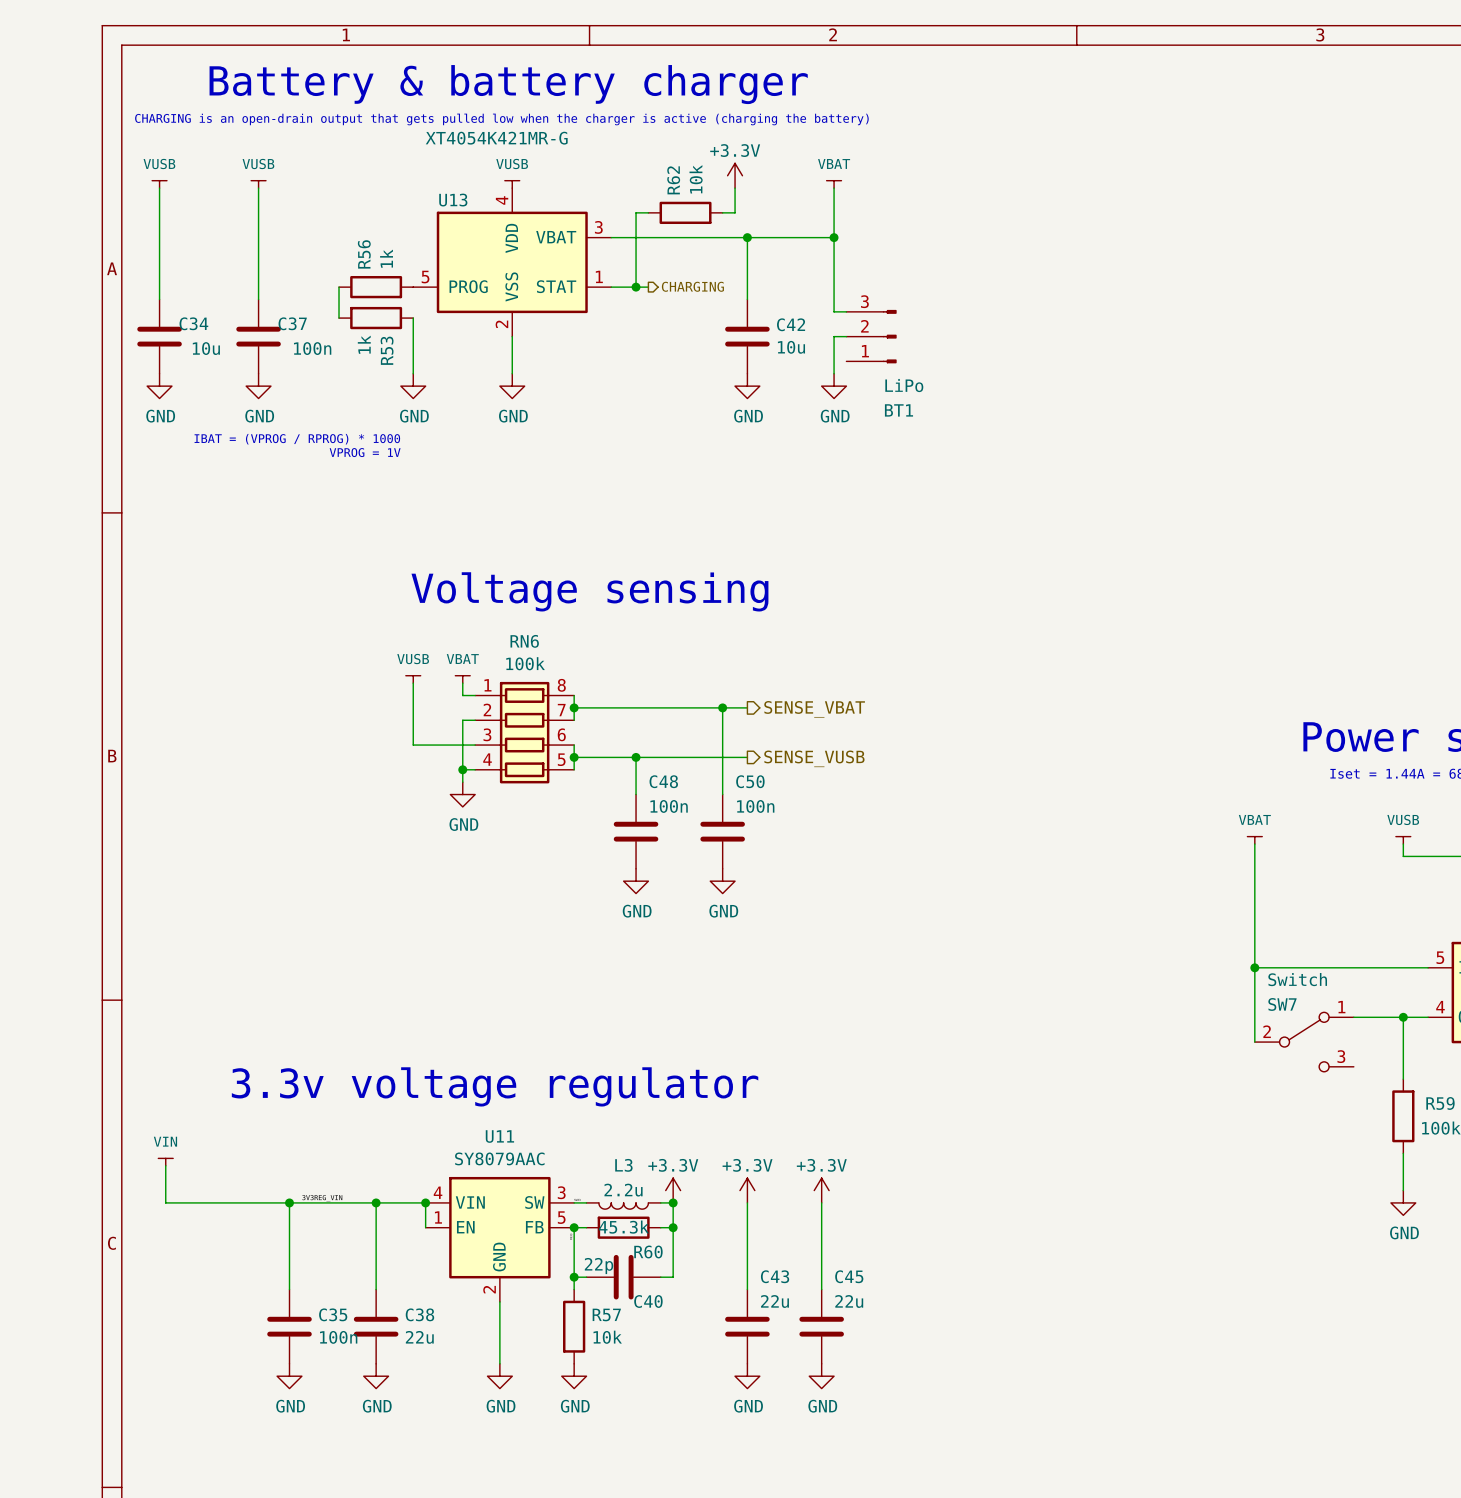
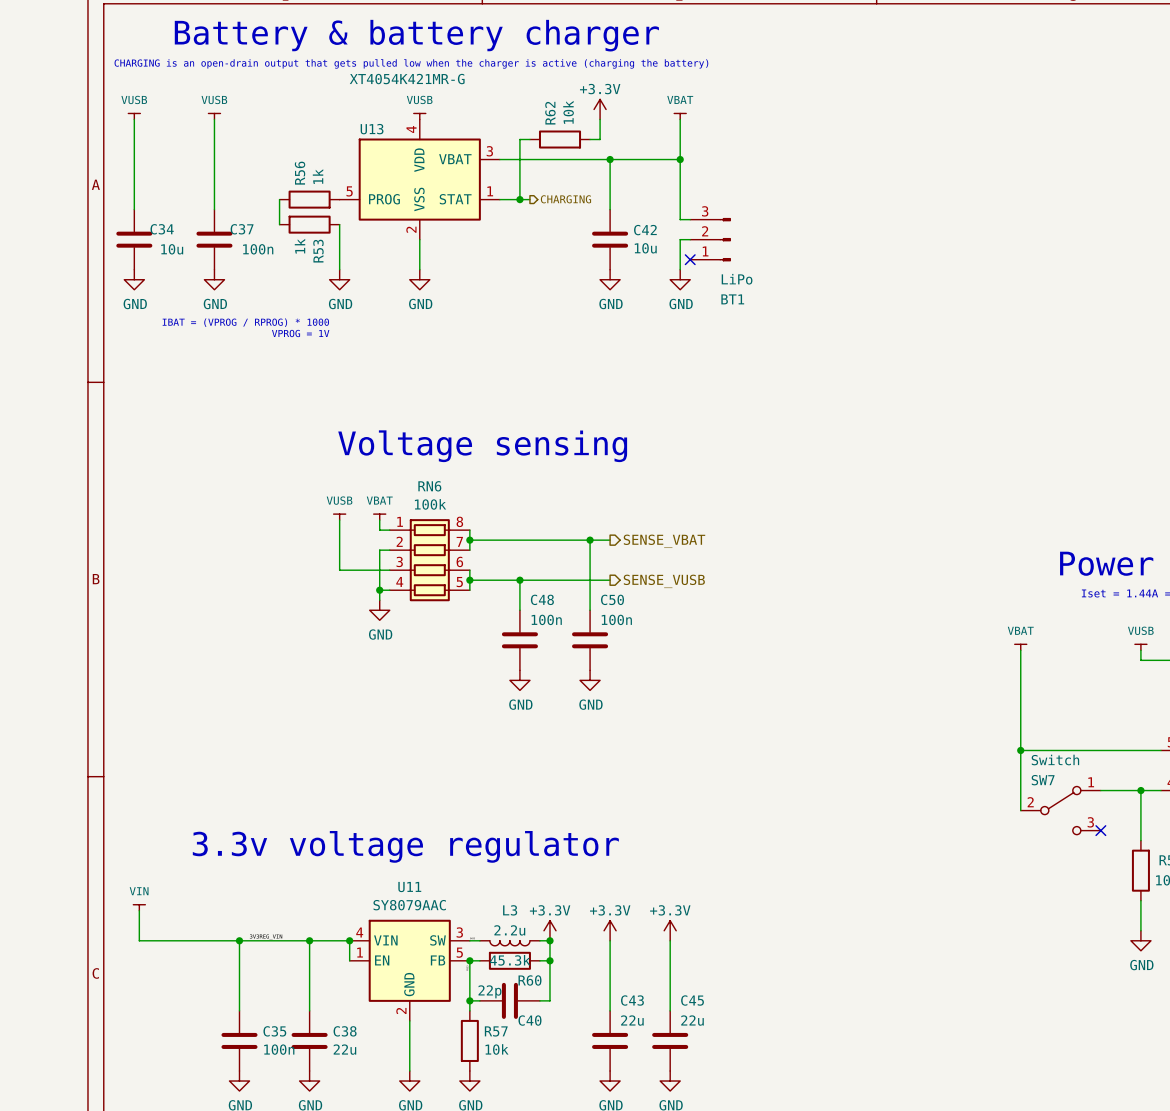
no-connect mark: none -> (690, 259)
no-connect mark: none -> (1100, 830)

